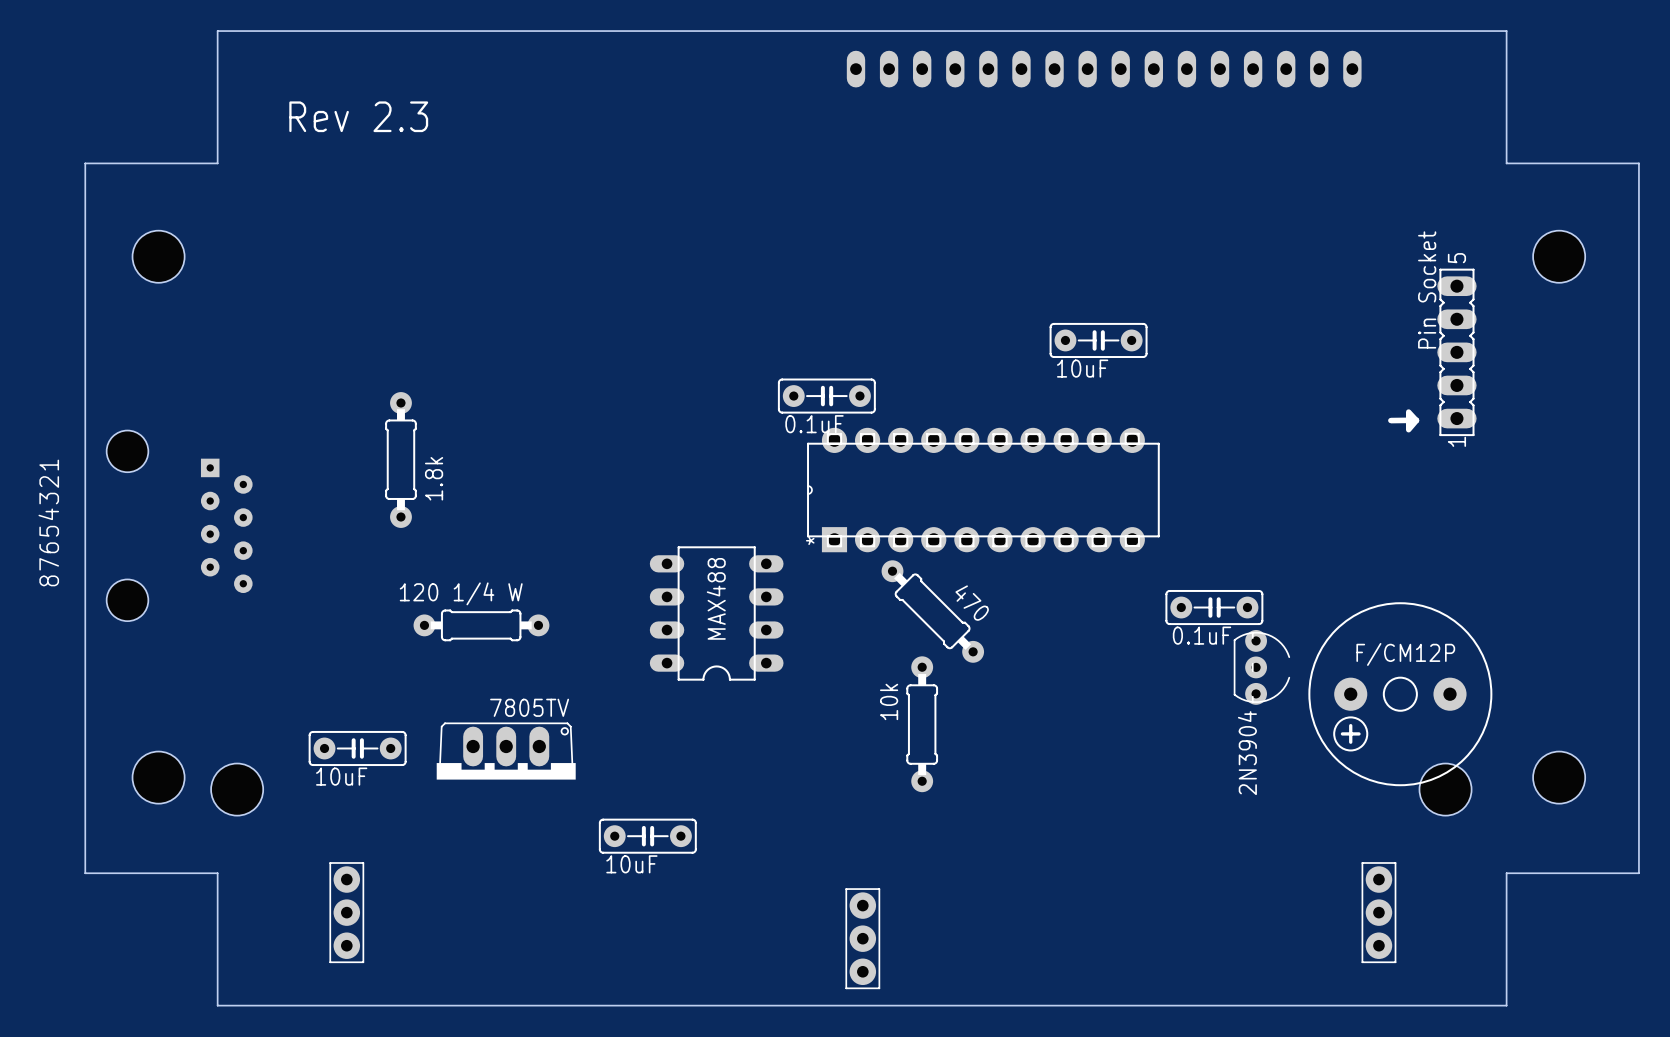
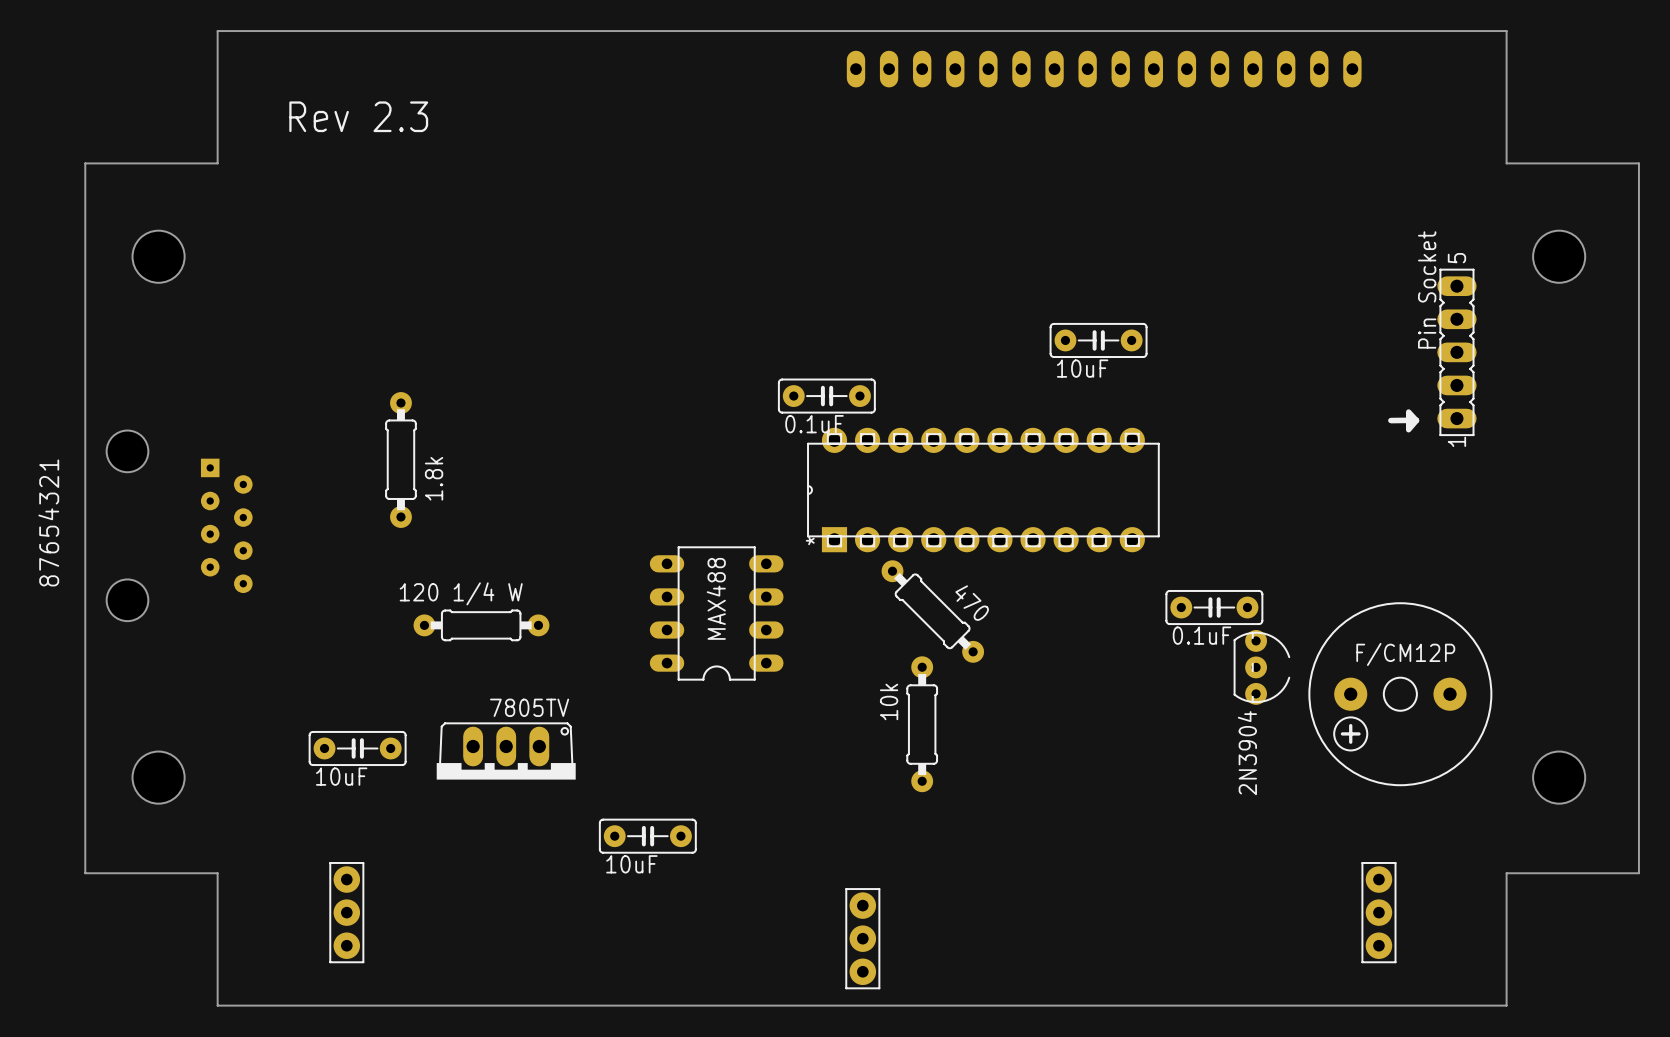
hole: (237, 789) -> none
hole: (1445, 789) -> none

